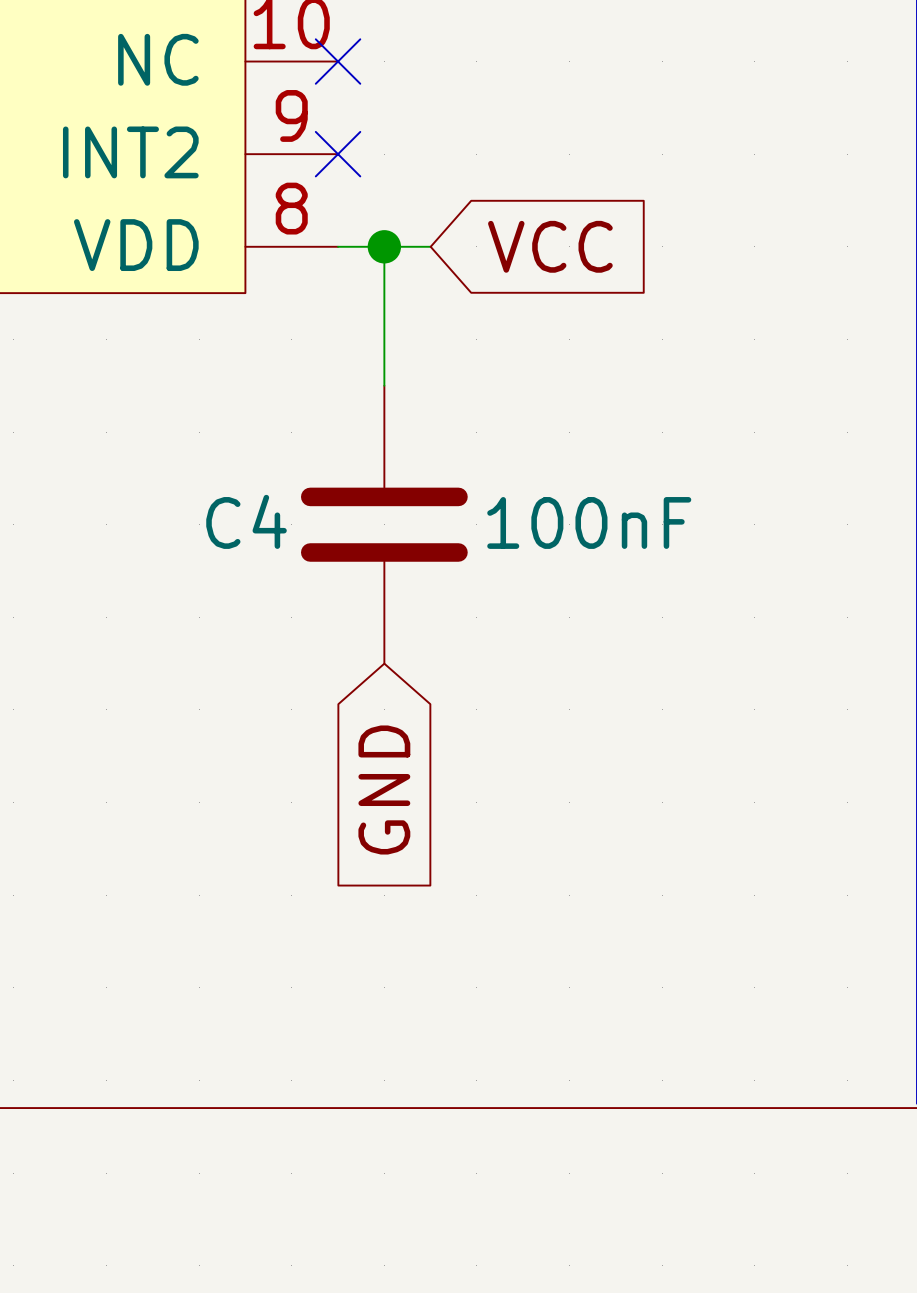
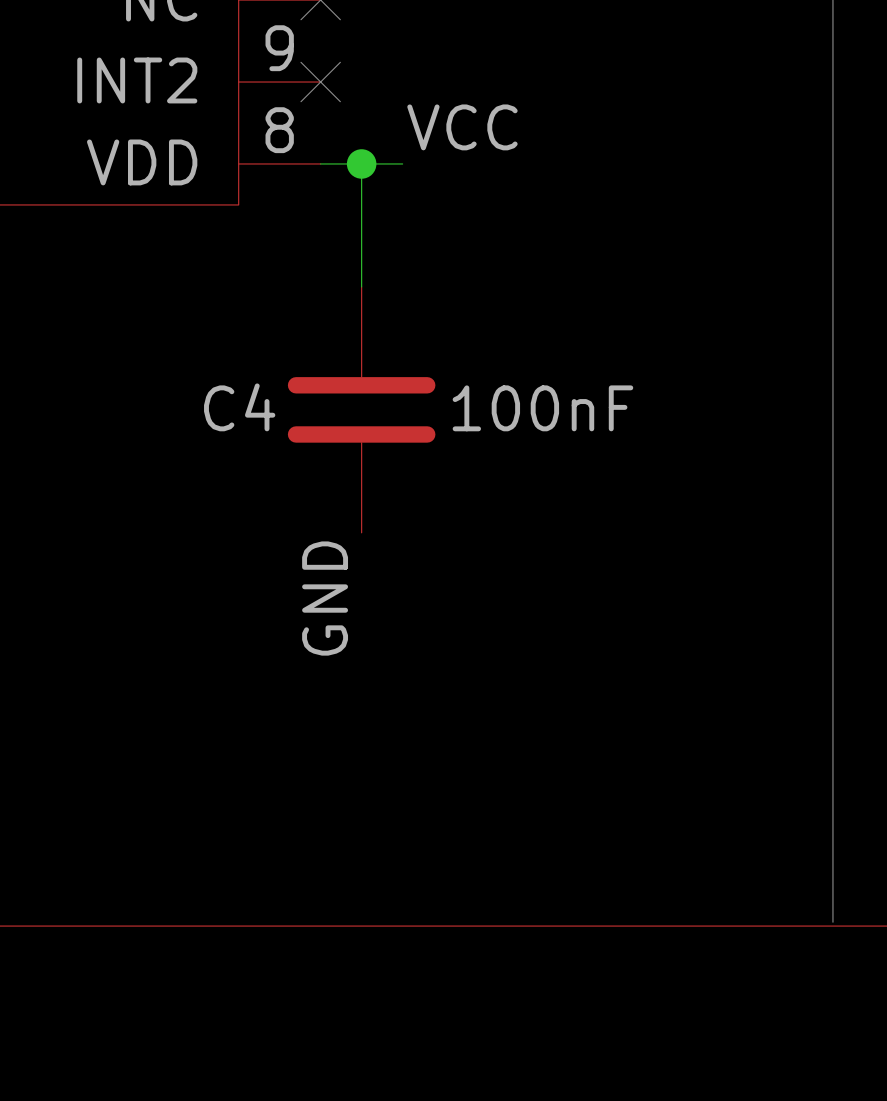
label: none -> VCC (462, 127)
global label: VCC (550, 246) -> none
label: none -> GND (325, 598)
global label: GND (384, 790) -> none

